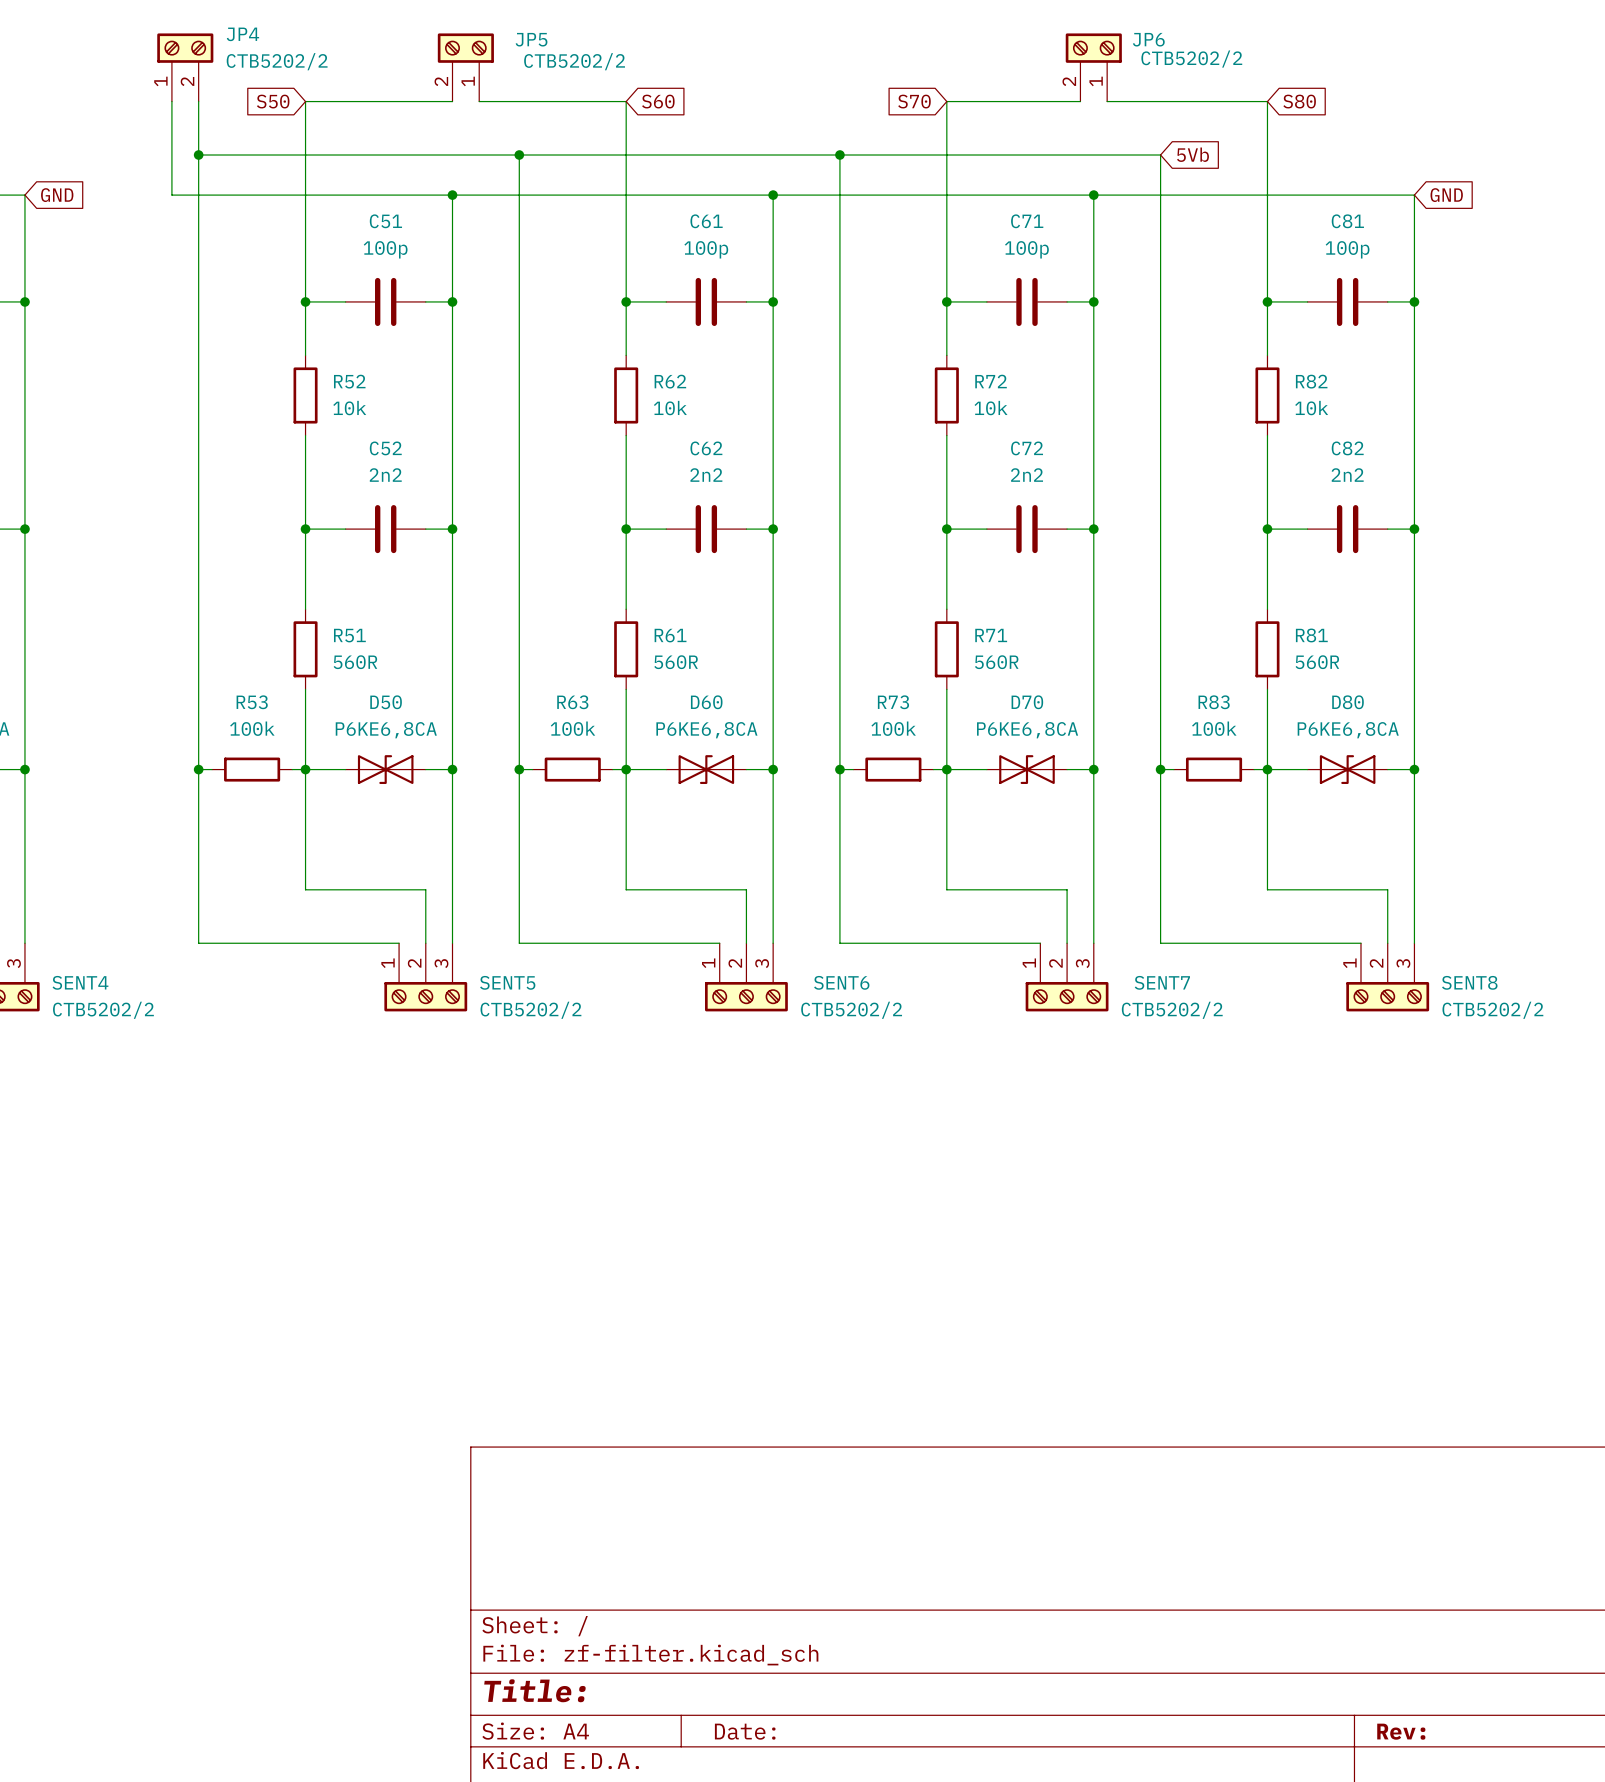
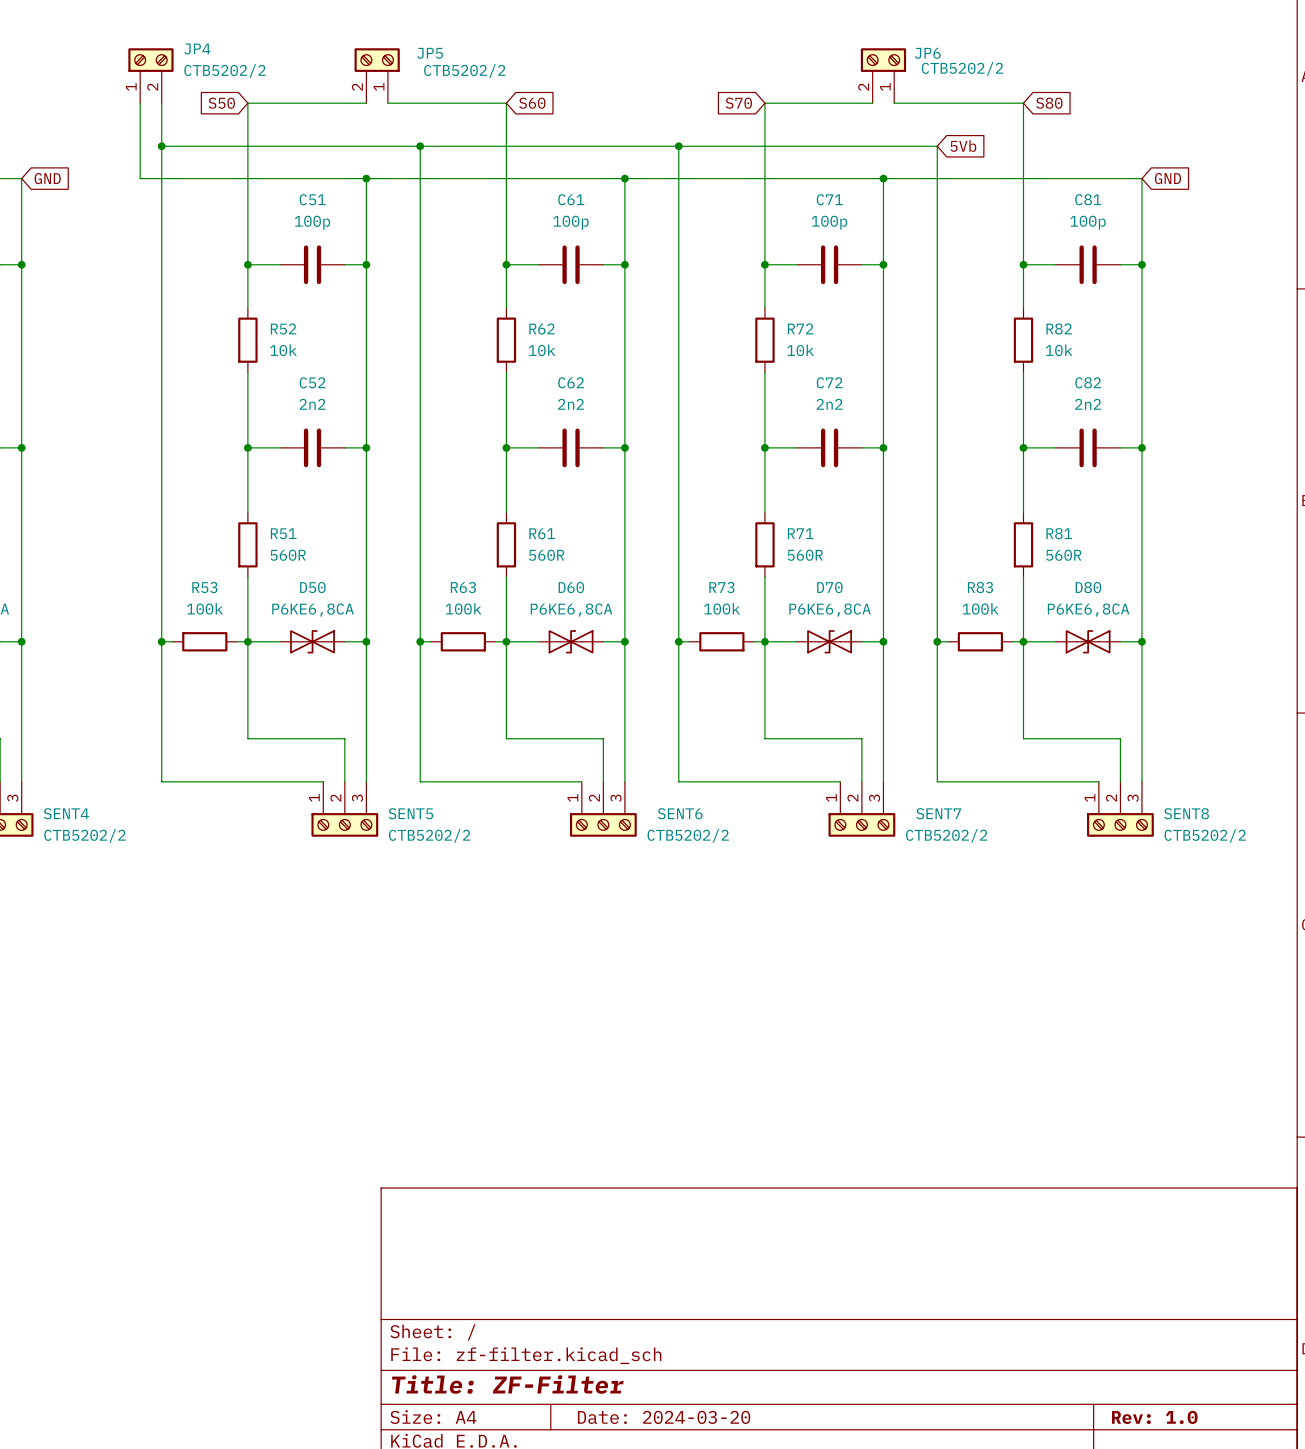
title block: Title: (534, 1690) -> Title: ZF-Filter (507, 1384)
title block: Date: (745, 1731) -> Date: 2024-03-20 (664, 1417)
title block: Rev: (1401, 1731) -> Rev: 1.0 (1154, 1417)

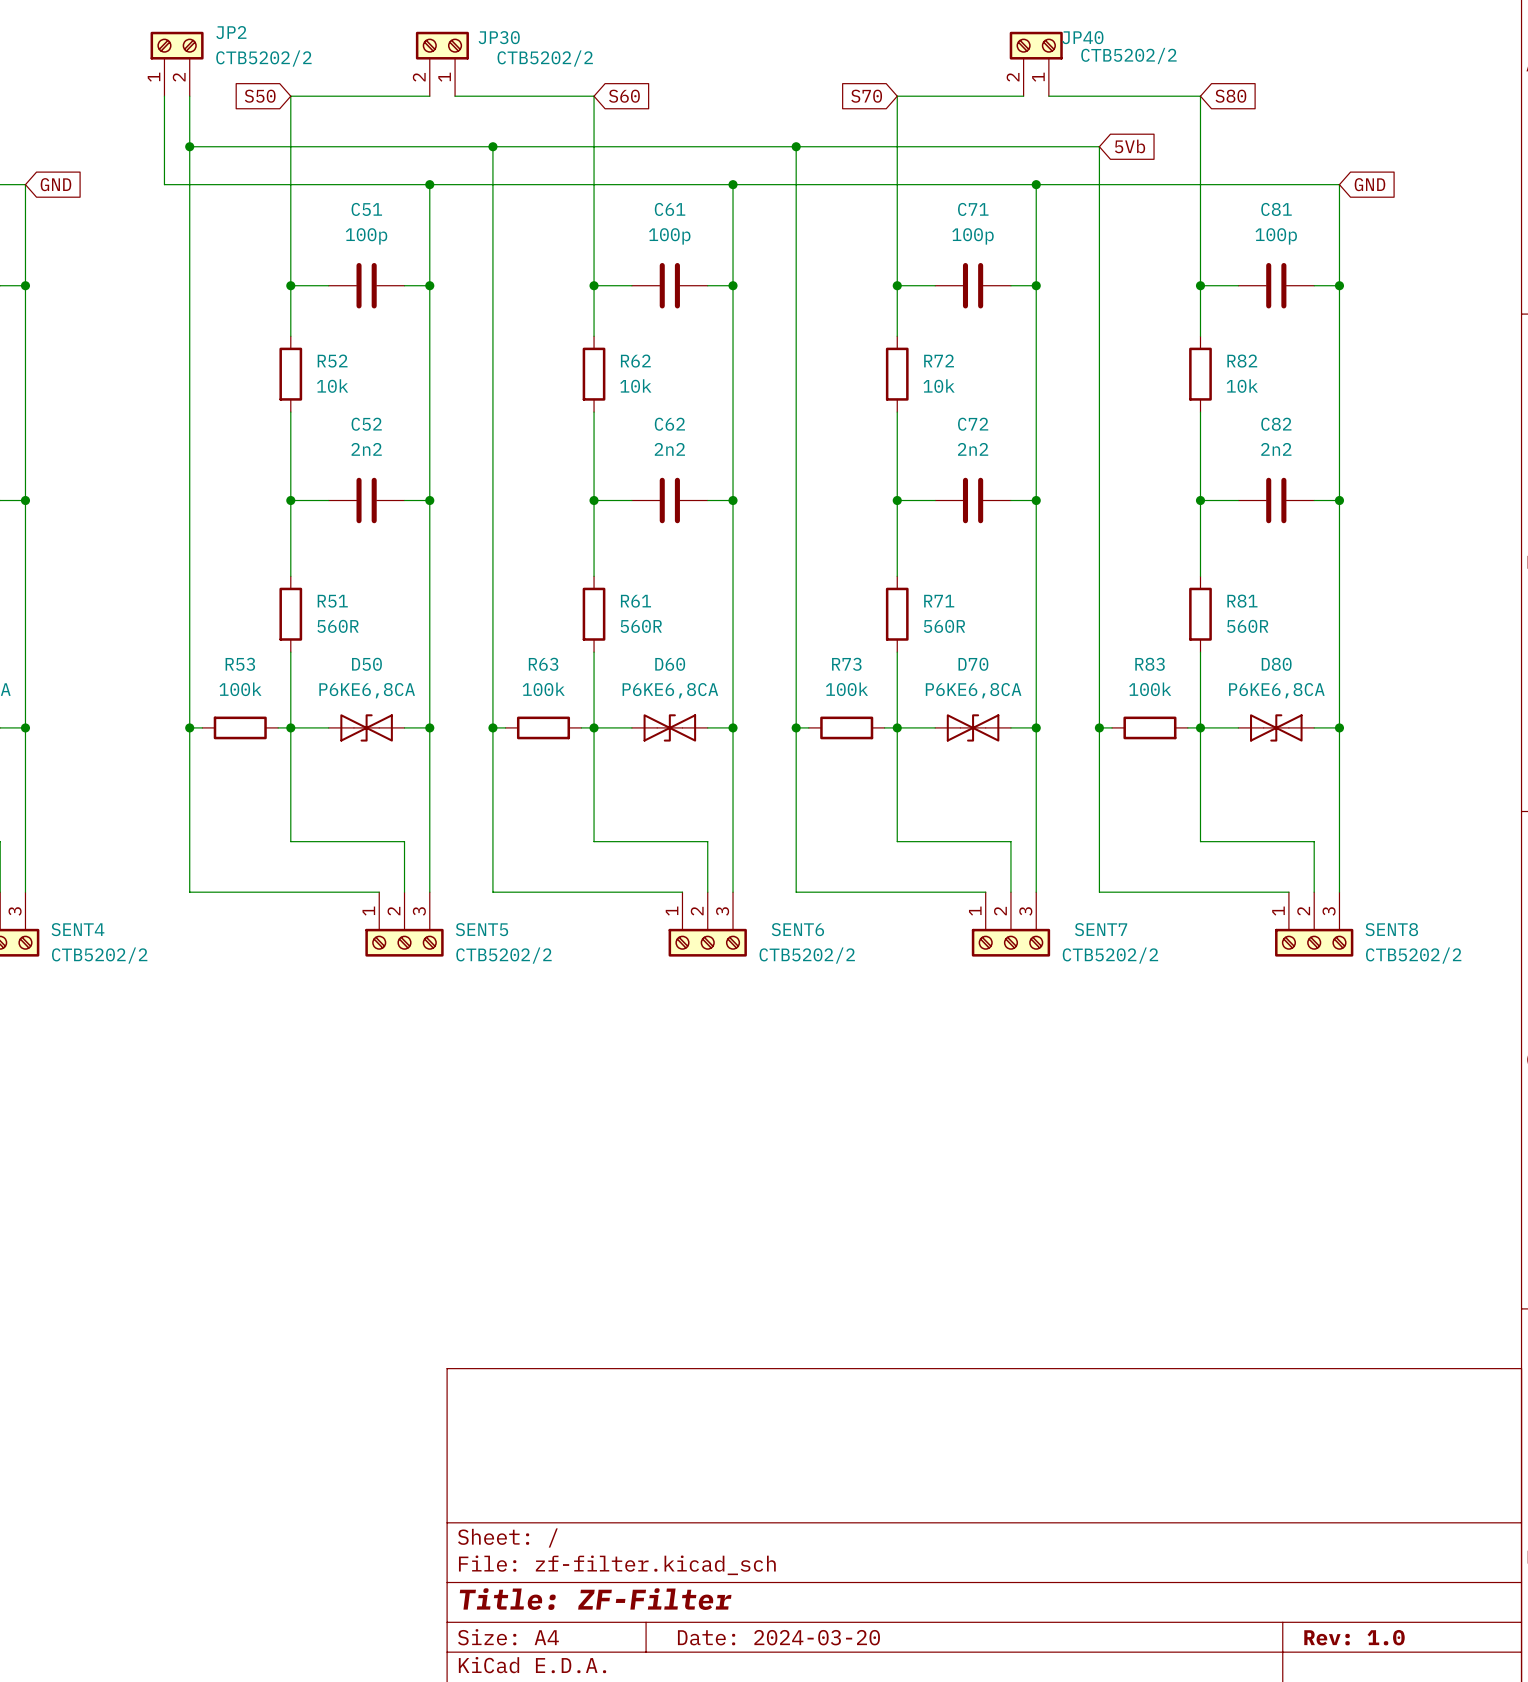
JP4 name: JP4 (197, 49) -> JP2 (231, 32)
JP5 name: JP5 (430, 53) -> JP30 (499, 37)
JP6 name: JP6 (927, 53) -> JP40 (1082, 37)

